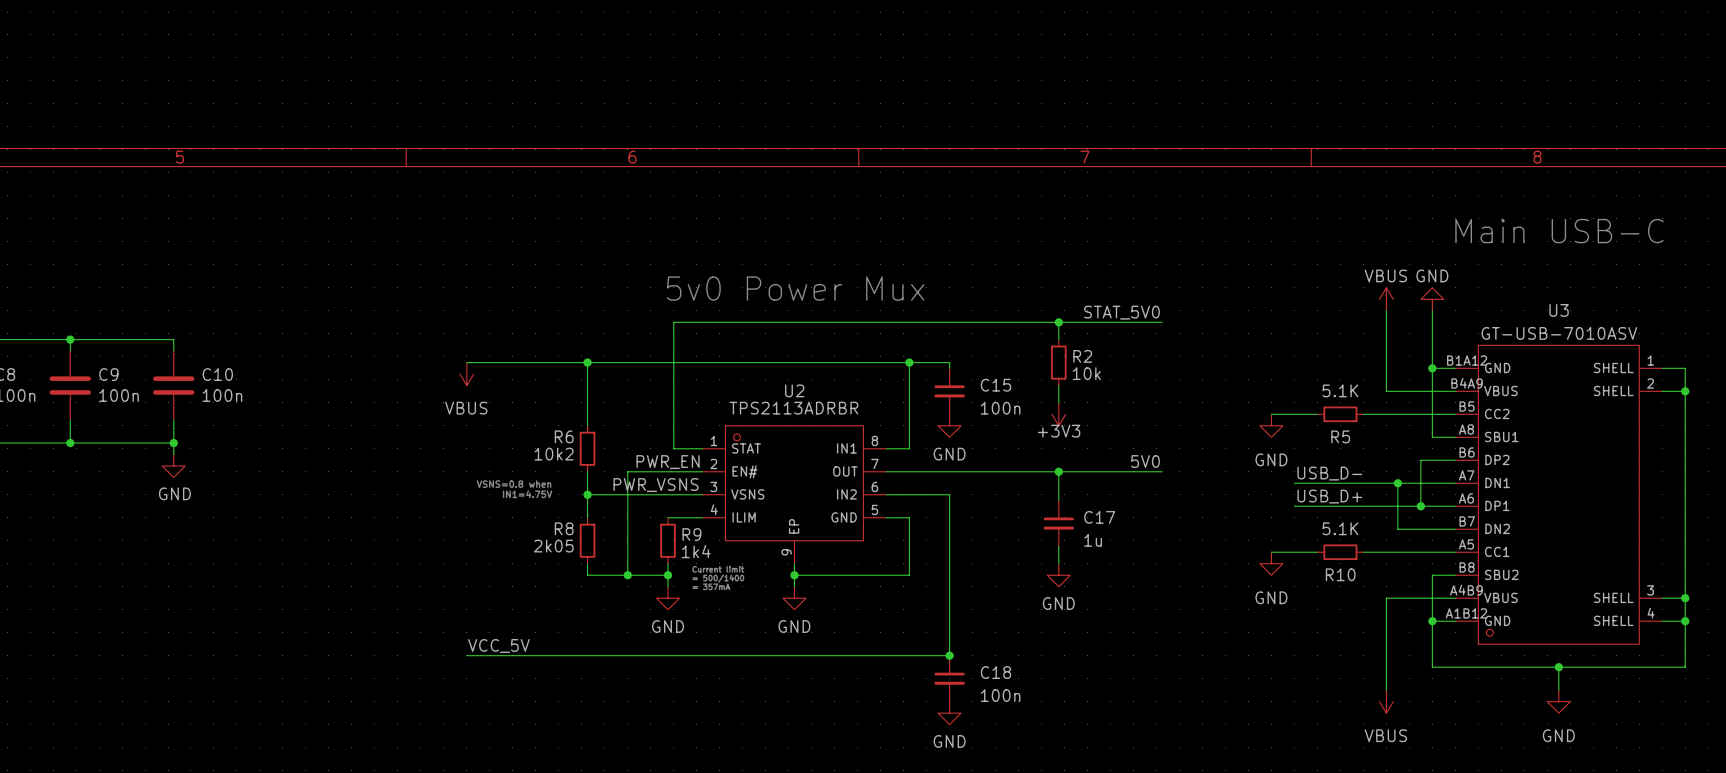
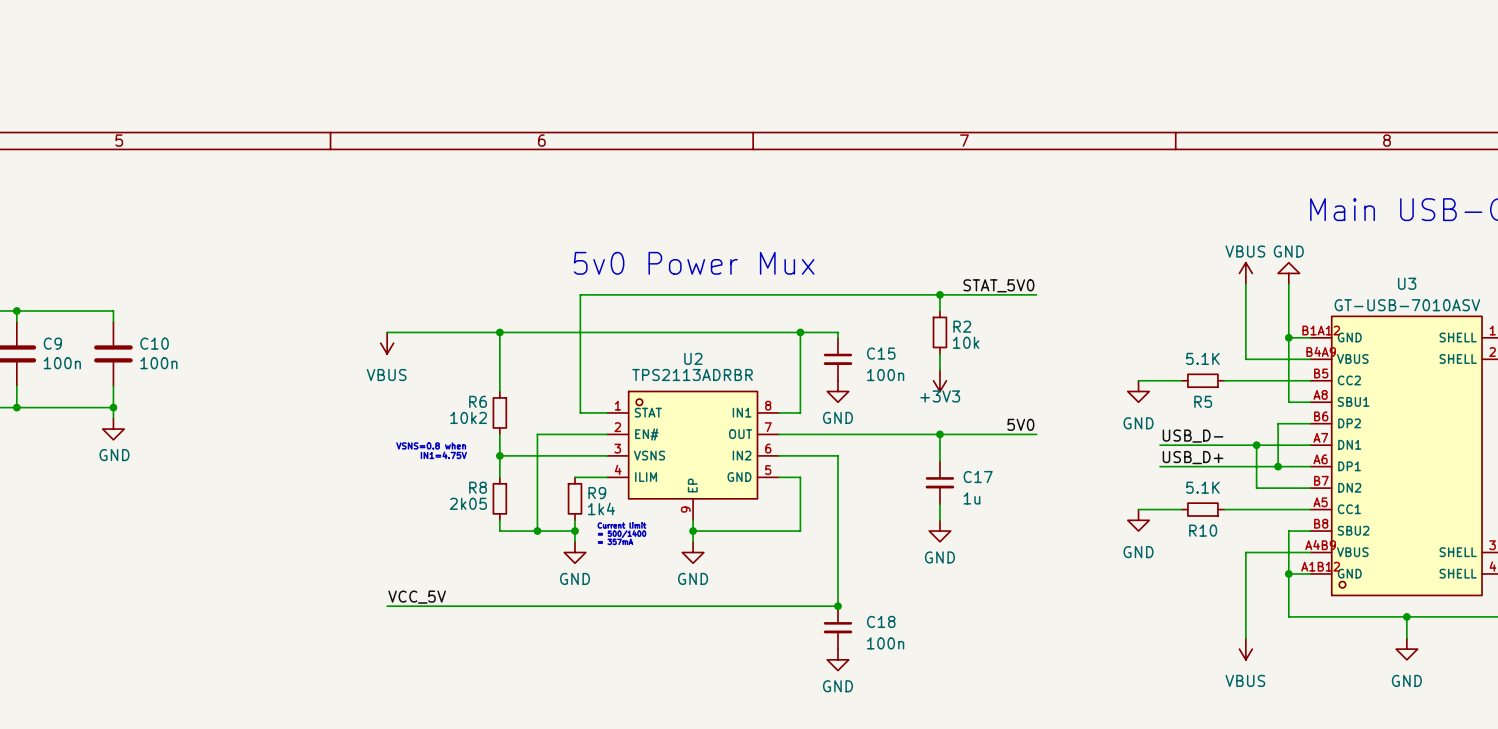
label: PWR_EN (668, 462) -> none
label: PWR_VSNS (656, 485) -> none

